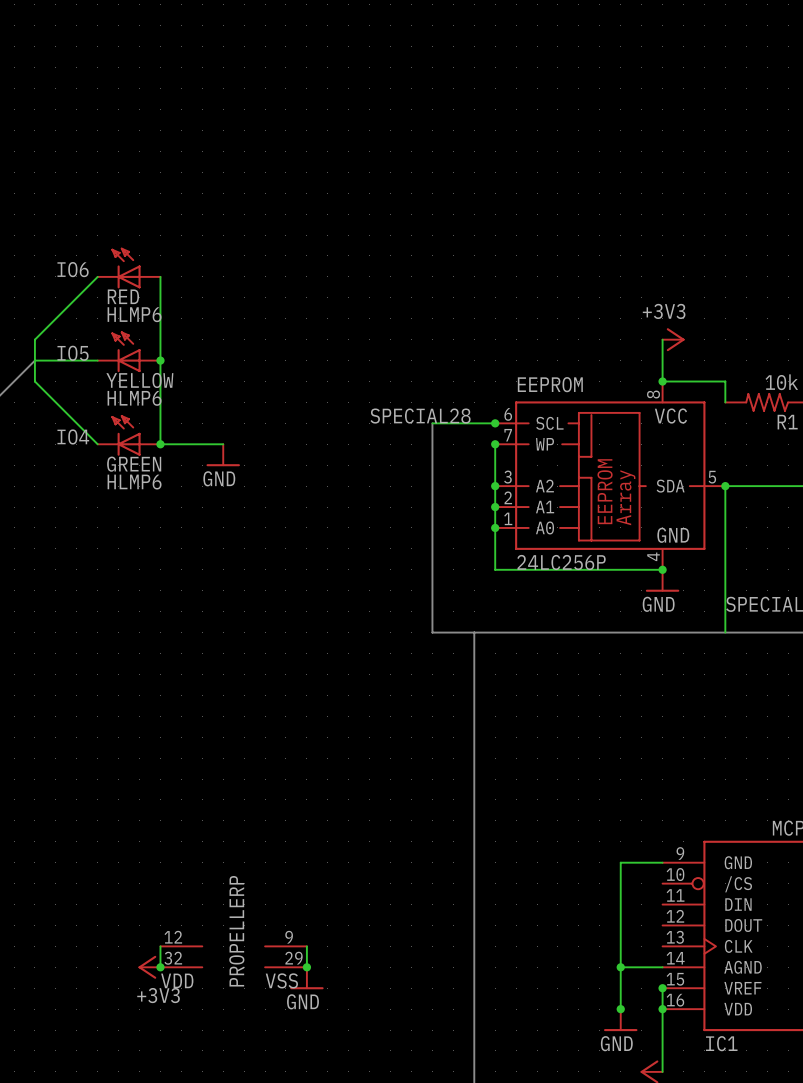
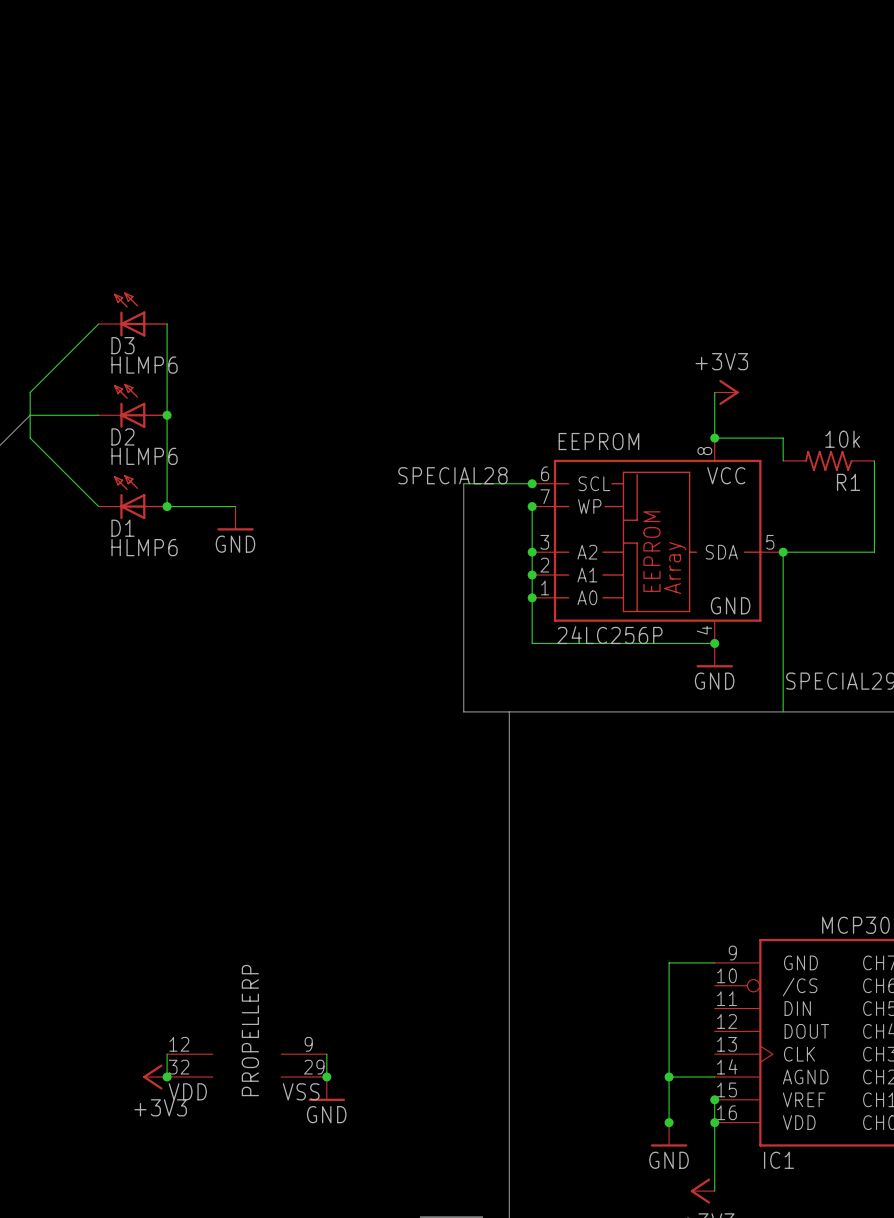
label: IO6 (73, 269) -> none
RED name: RED (123, 296) -> D3 (122, 345)
label: IO5 (73, 353) -> none
YELLOW name: YELLOW (139, 380) -> D2 (122, 436)
label: IO4 (73, 436) -> none
GREEN name: GREEN (134, 464) -> D1 (122, 528)

